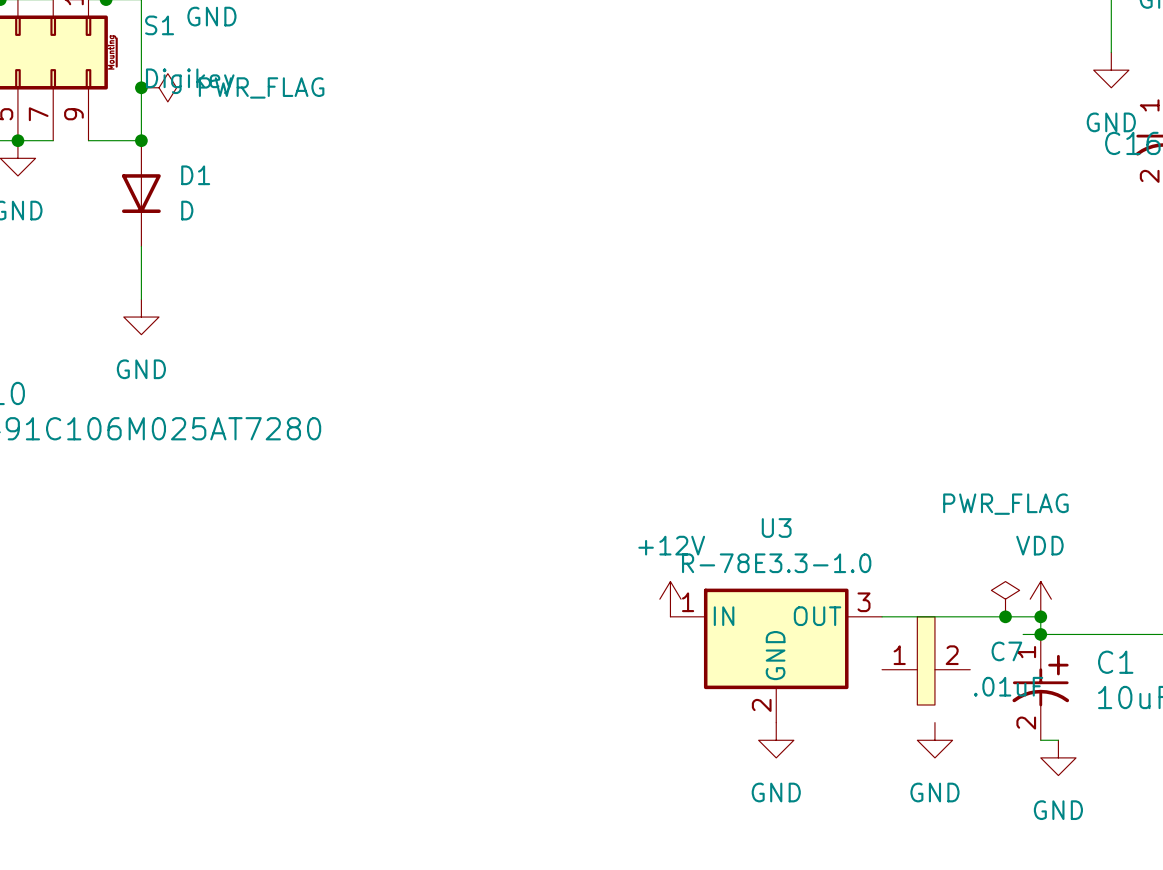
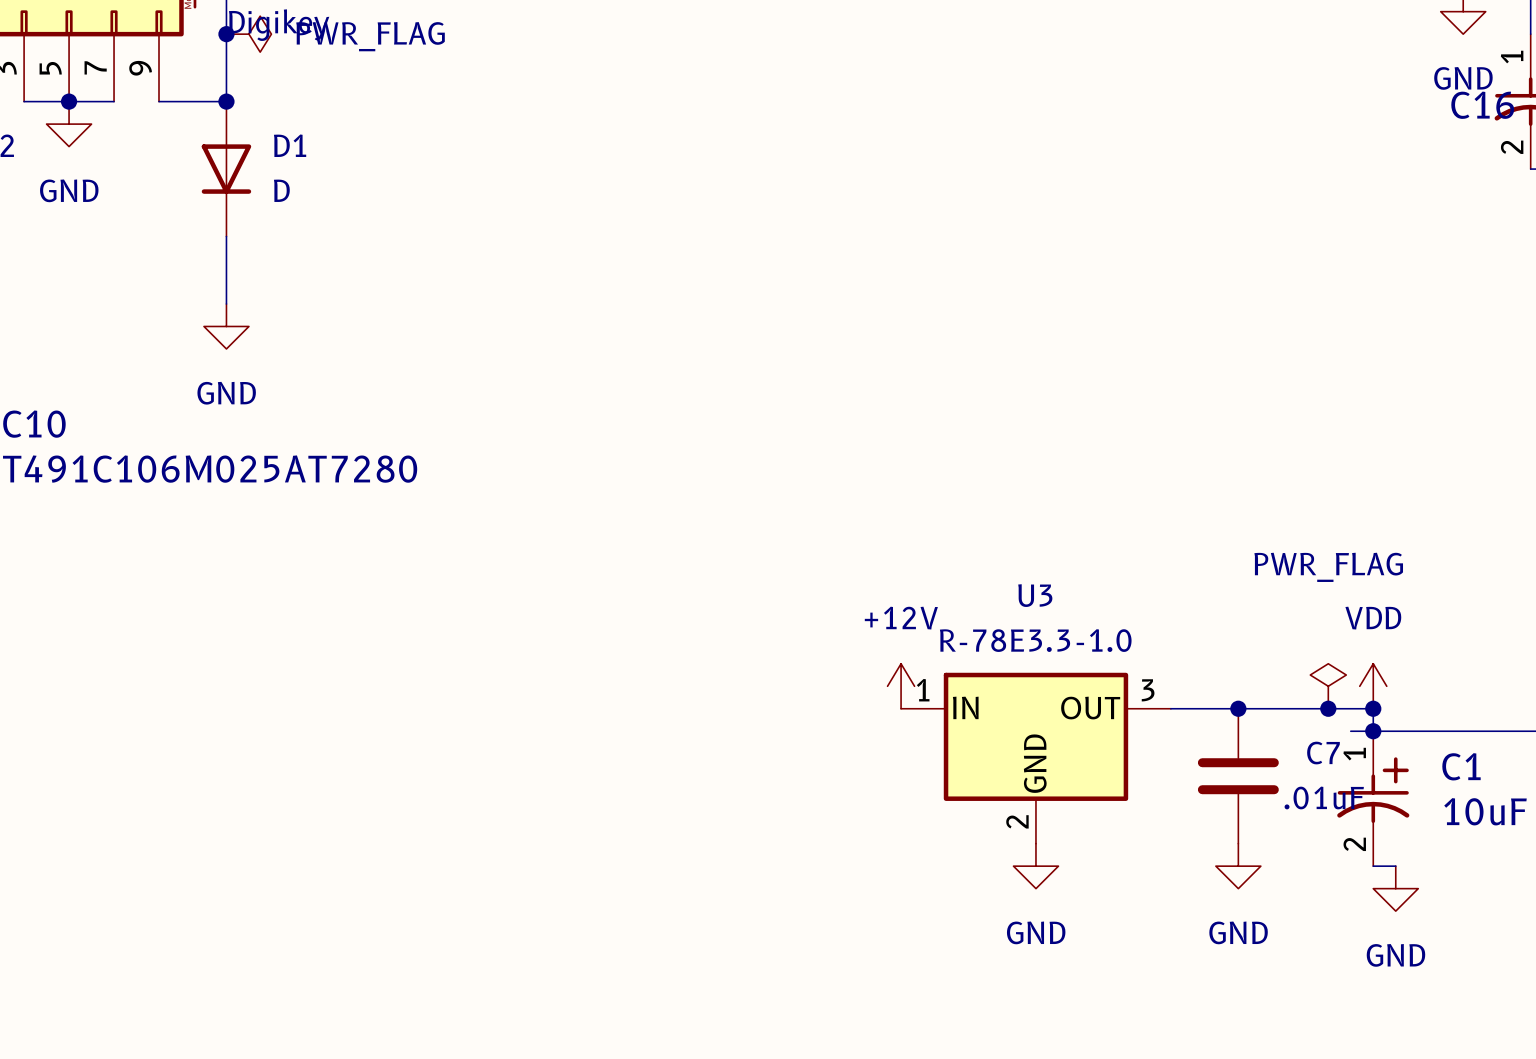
C7 symbol: [882, 616, 971, 706] -> [1197, 708, 1279, 844]
junction: none -> (1238, 708)

